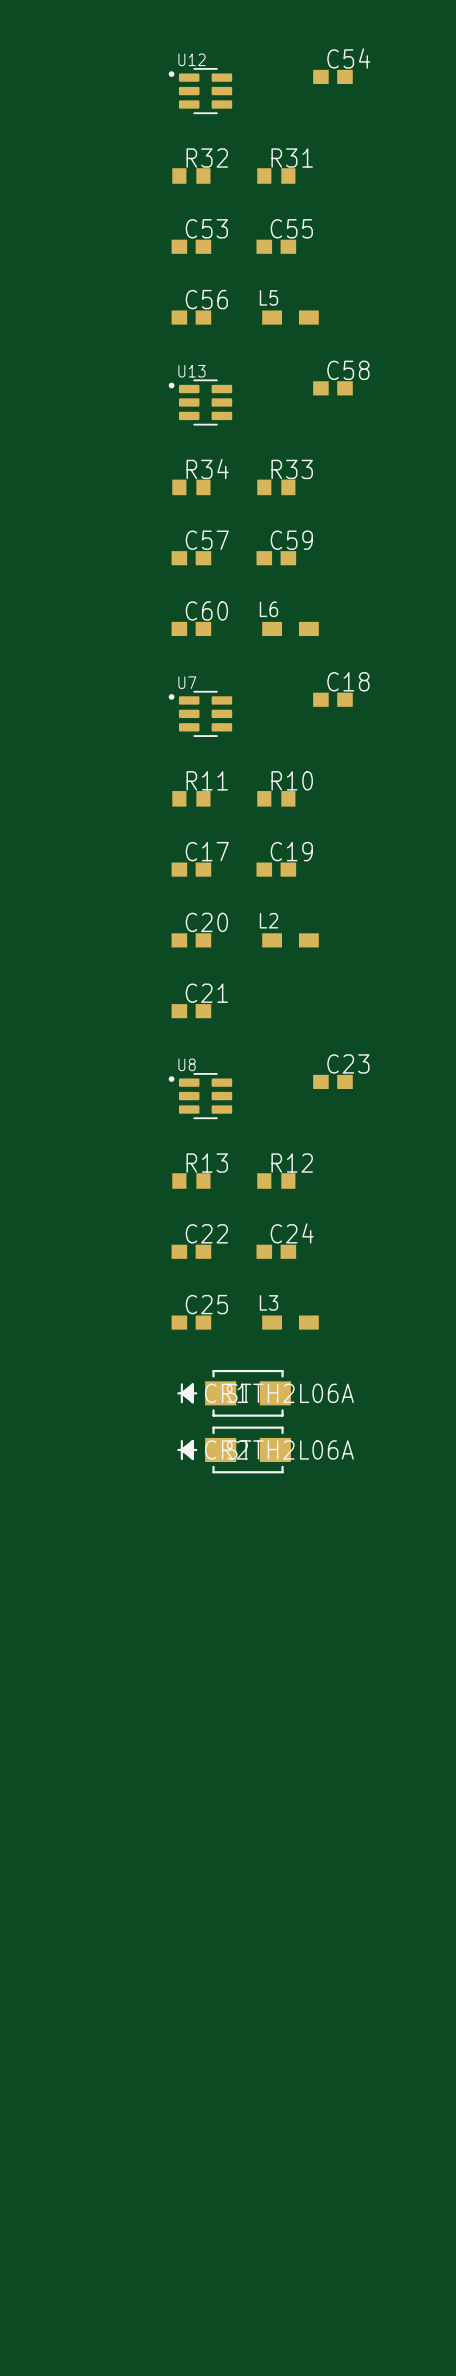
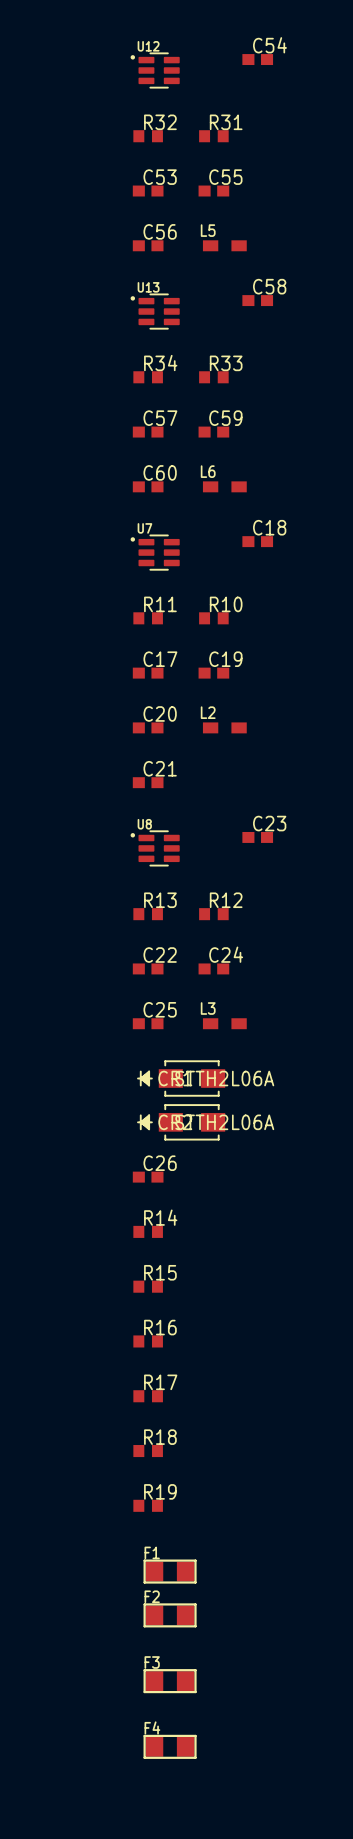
C26: none -> (148, 1177)
R14: none -> (148, 1231)
R15: none -> (148, 1286)
R16: none -> (148, 1341)
R17: none -> (148, 1396)
R18: none -> (148, 1451)
R19: none -> (148, 1505)
F1: none -> (170, 1571)
F2: none -> (170, 1615)
F3: none -> (170, 1681)
F4: none -> (170, 1746)

